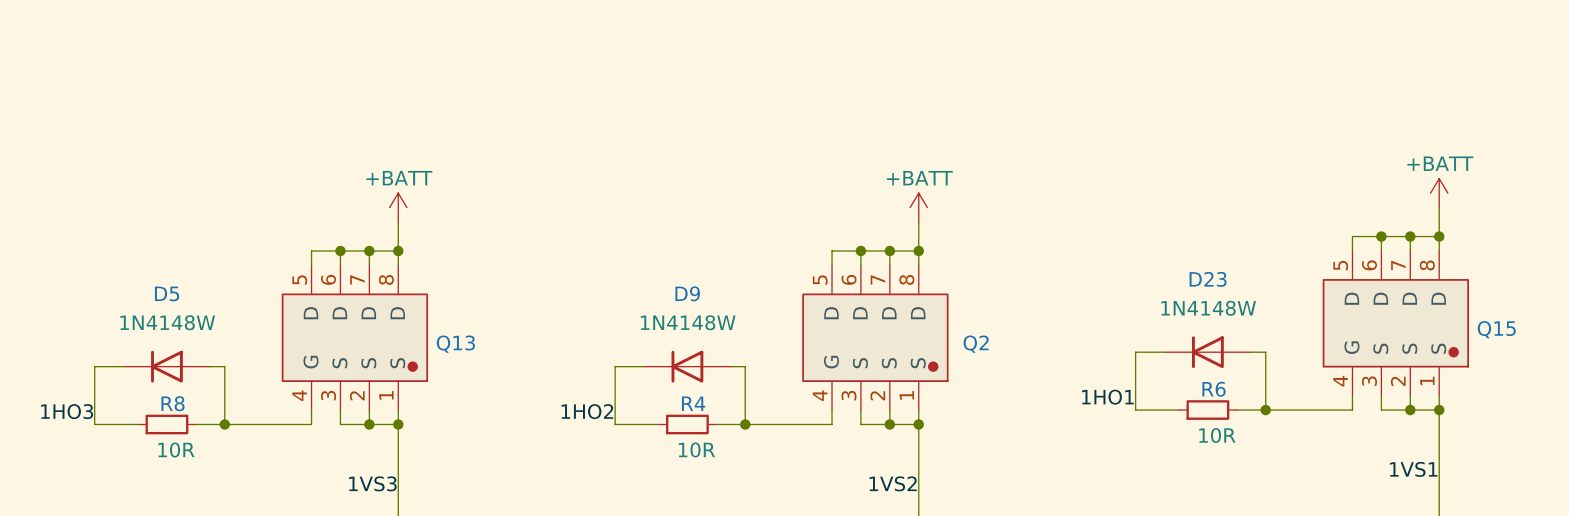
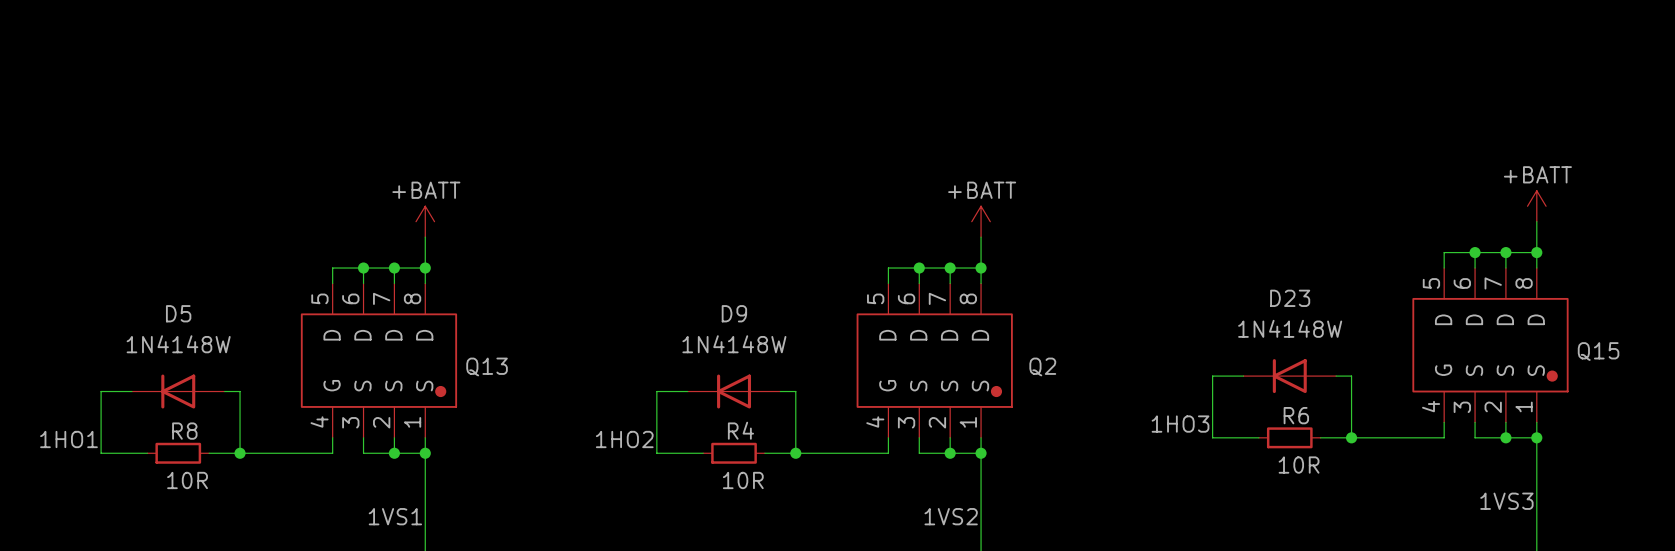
label: 1HO1 (1107, 397) -> 1HO3 (1180, 424)
label: 1HO3 (67, 411) -> 1HO1 (68, 439)
label: 1VS1 (1413, 469) -> 1VS3 (1506, 501)
label: 1VS3 (372, 483) -> 1VS1 (395, 516)

